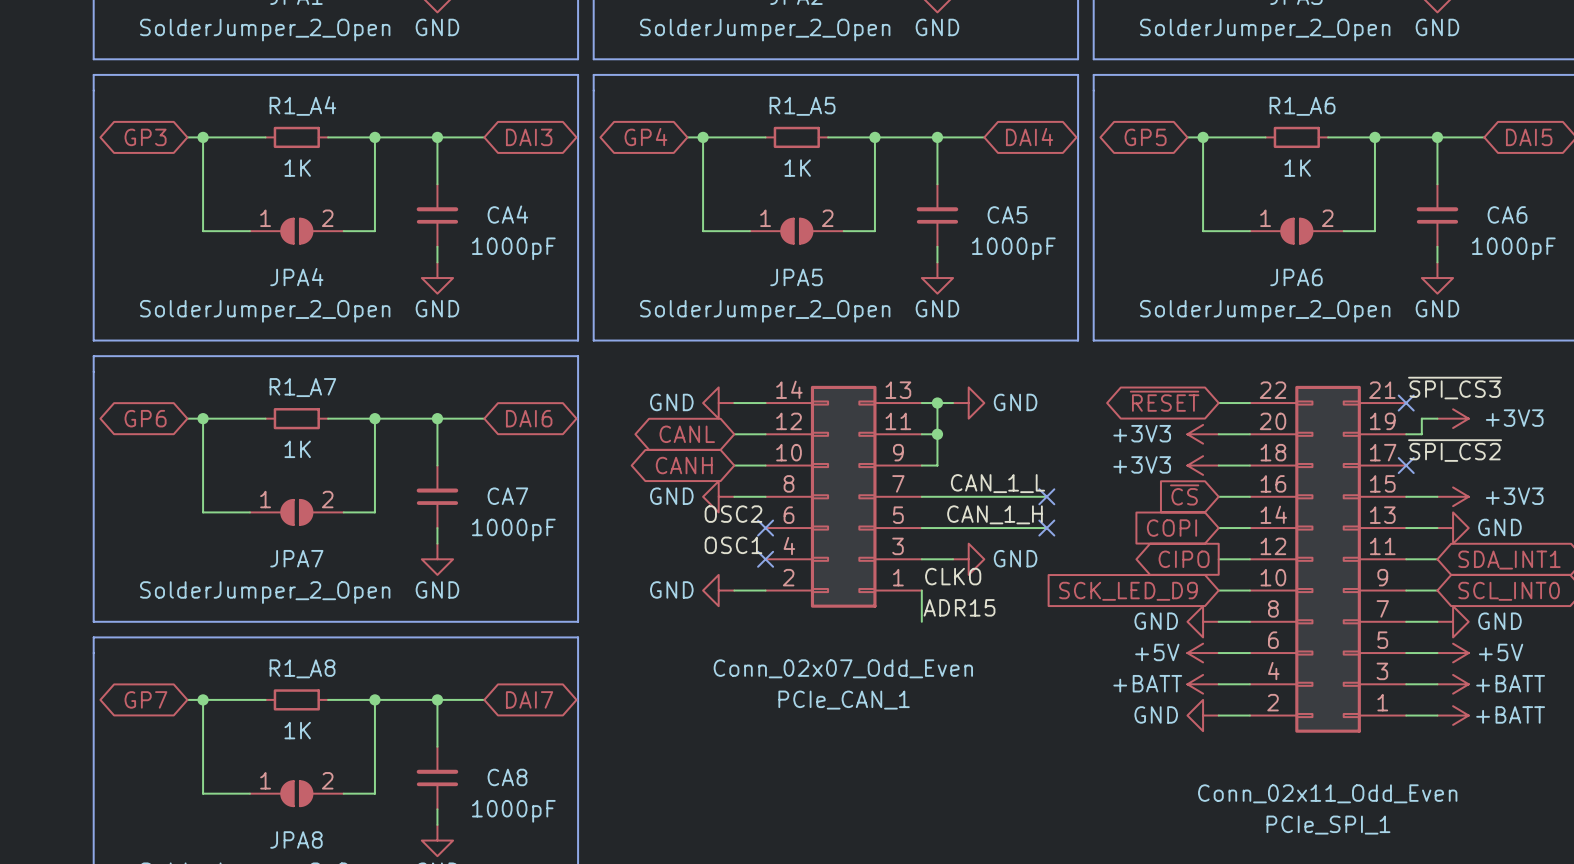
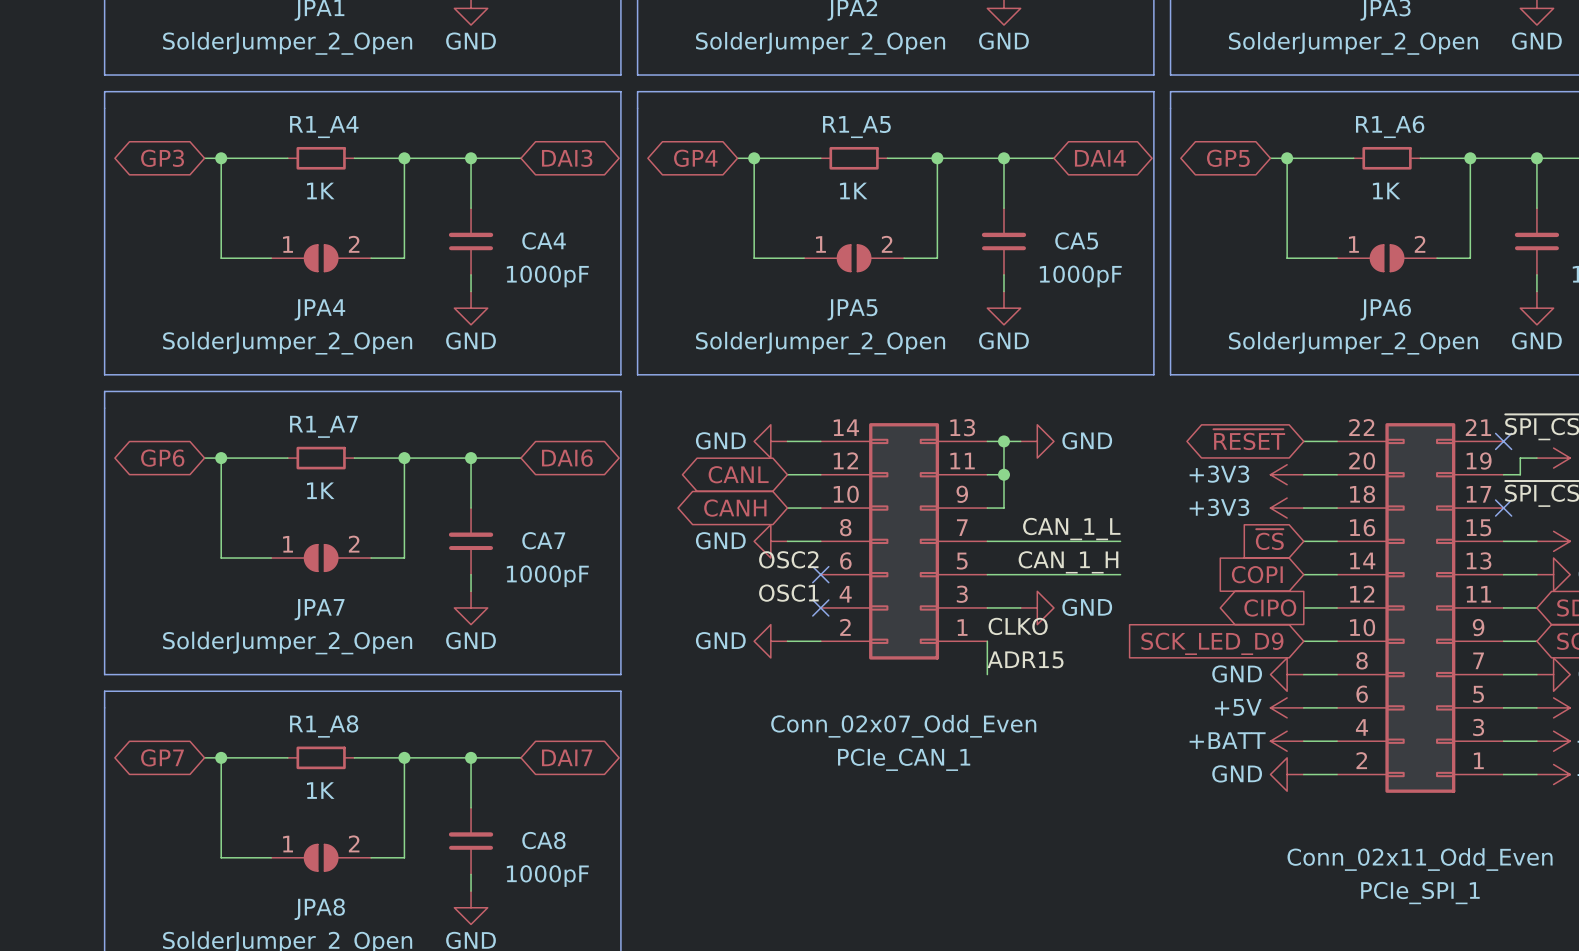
no-connect mark: (1046, 496) -> none
no-connect mark: (1046, 528) -> none

